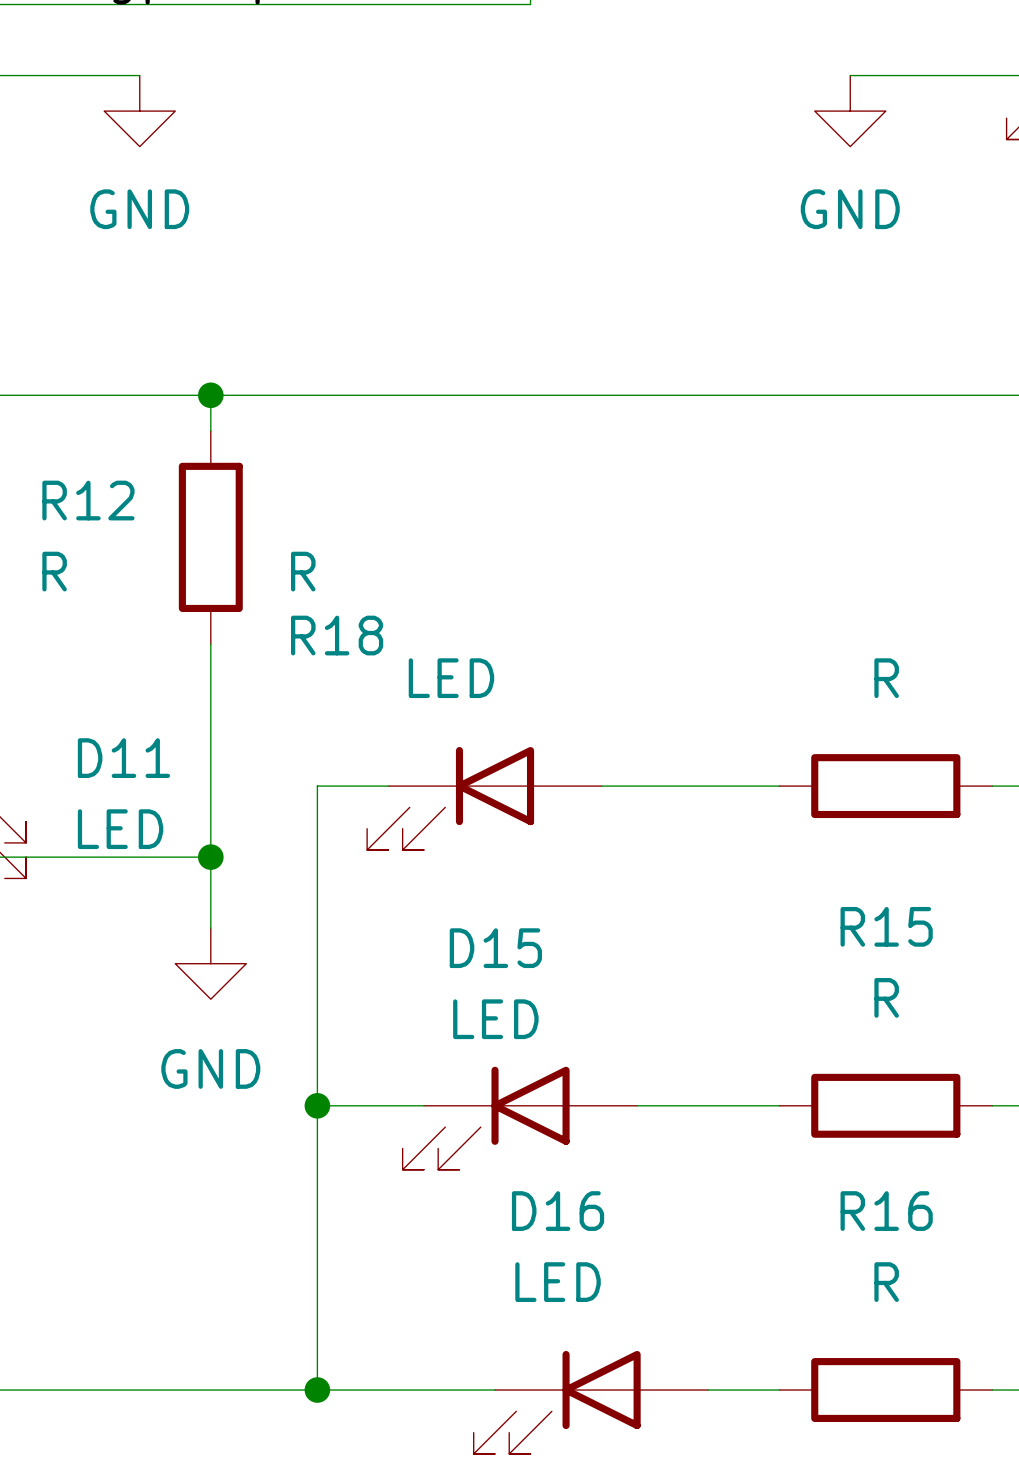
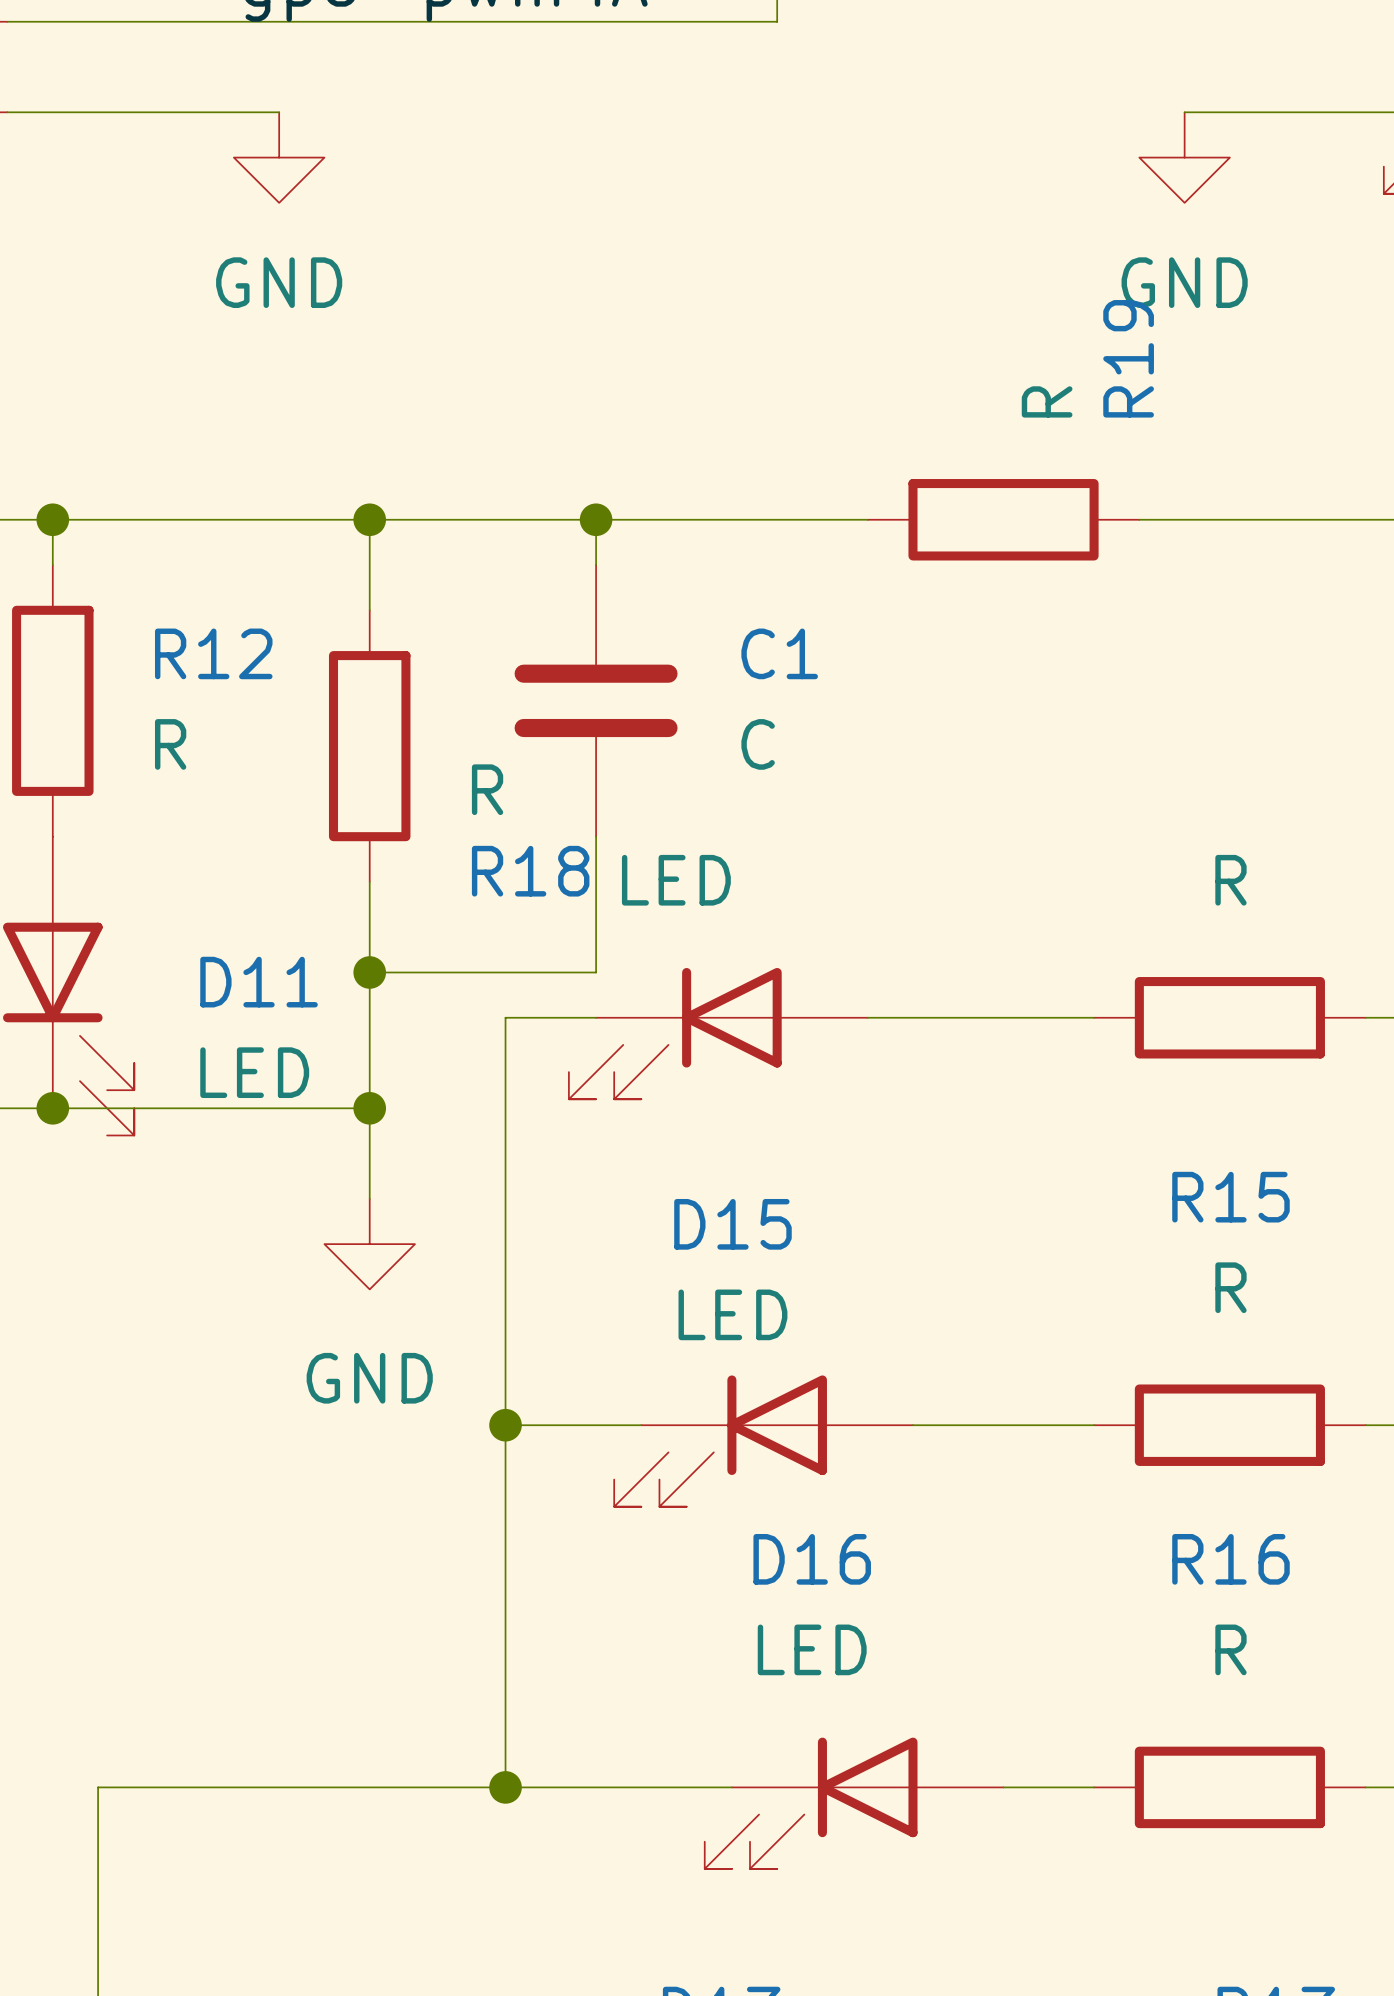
wire: none -> (596, 519) (596, 565)
junction: none -> (596, 519)
wire: (601, 395) (814, 395) -> none
R19: none -> R (1003, 519)
R18 position: (210, 537) -> (369, 746)
C1: none -> C (596, 700)
wire: none -> (596, 836) (596, 972) (369, 972)
junction: none -> (369, 972)

